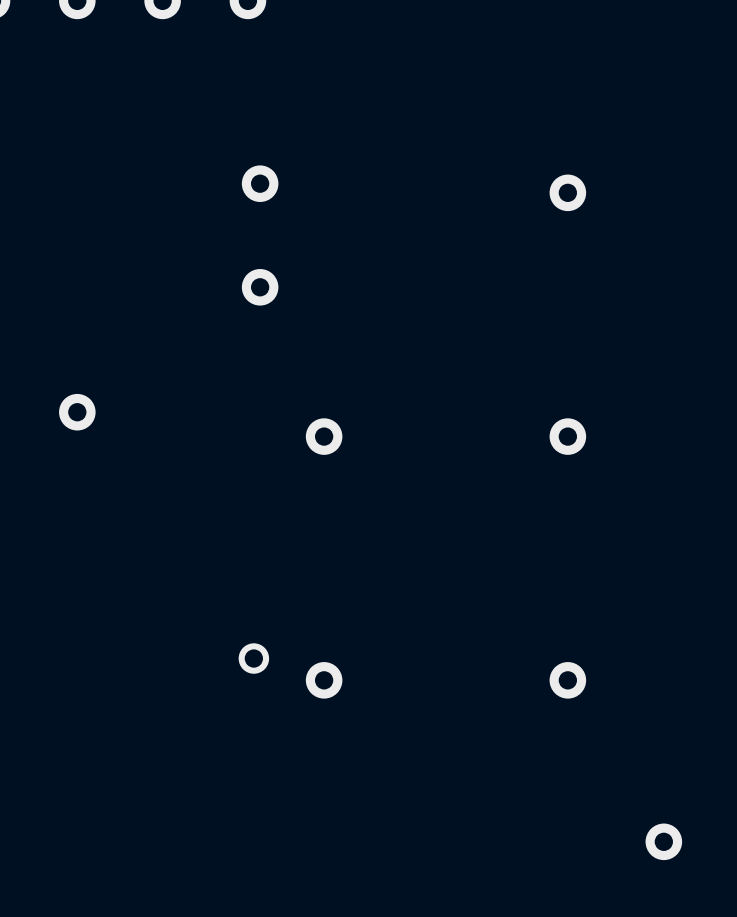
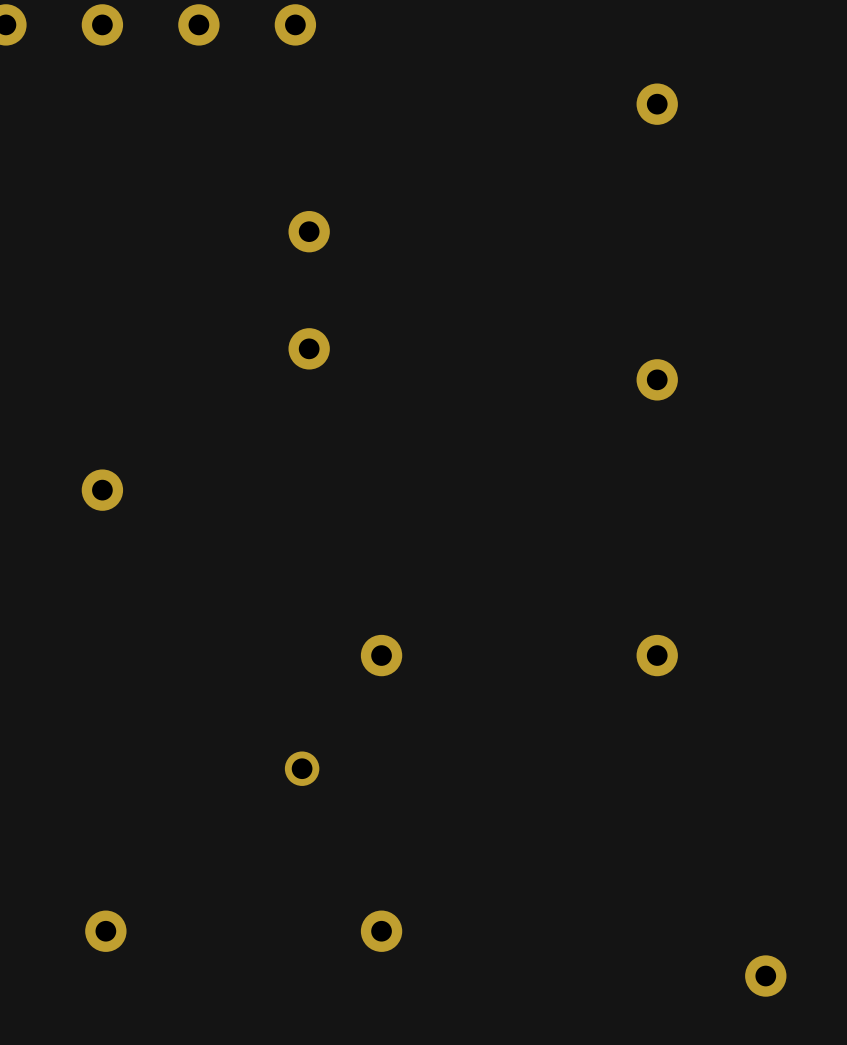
via: none -> (657, 104)
via: (567, 192) -> none
via: none -> (657, 379)
via: (324, 436) -> none
via: (567, 436) -> none
via: none -> (381, 655)
via: none -> (657, 655)
via: (324, 680) -> none
via: (567, 680) -> none
via: none -> (105, 931)
via: none -> (381, 931)

